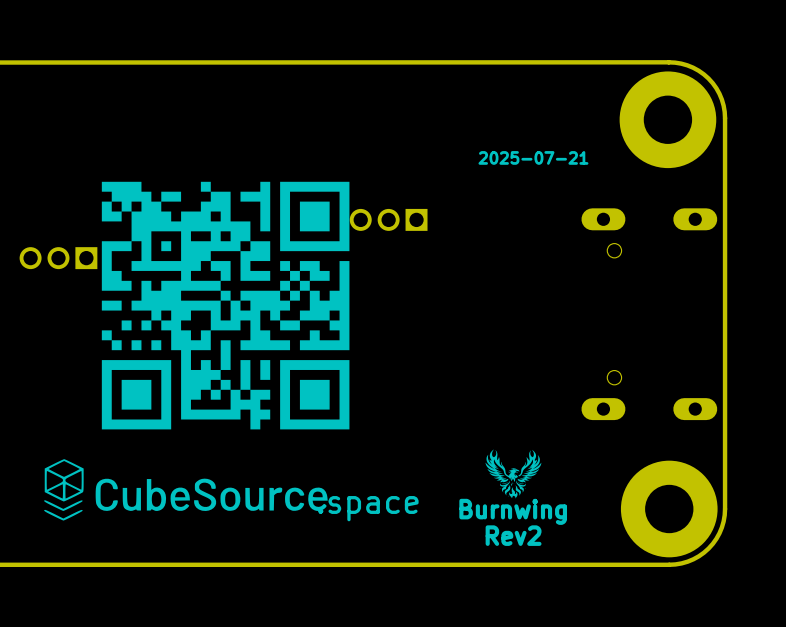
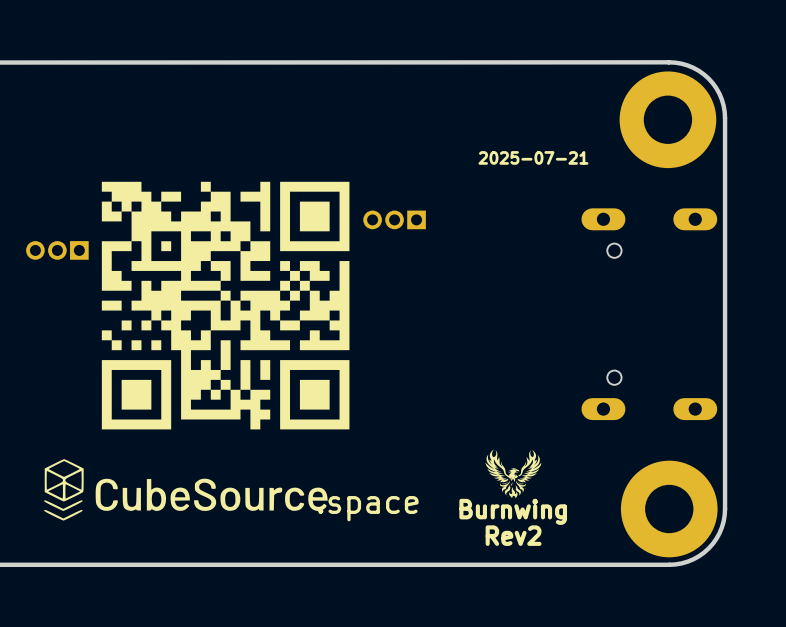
part footprint: [349, 208, 428, 231] -> [363, 210, 426, 230]
part footprint: [19, 247, 98, 270] -> [26, 241, 89, 260]

